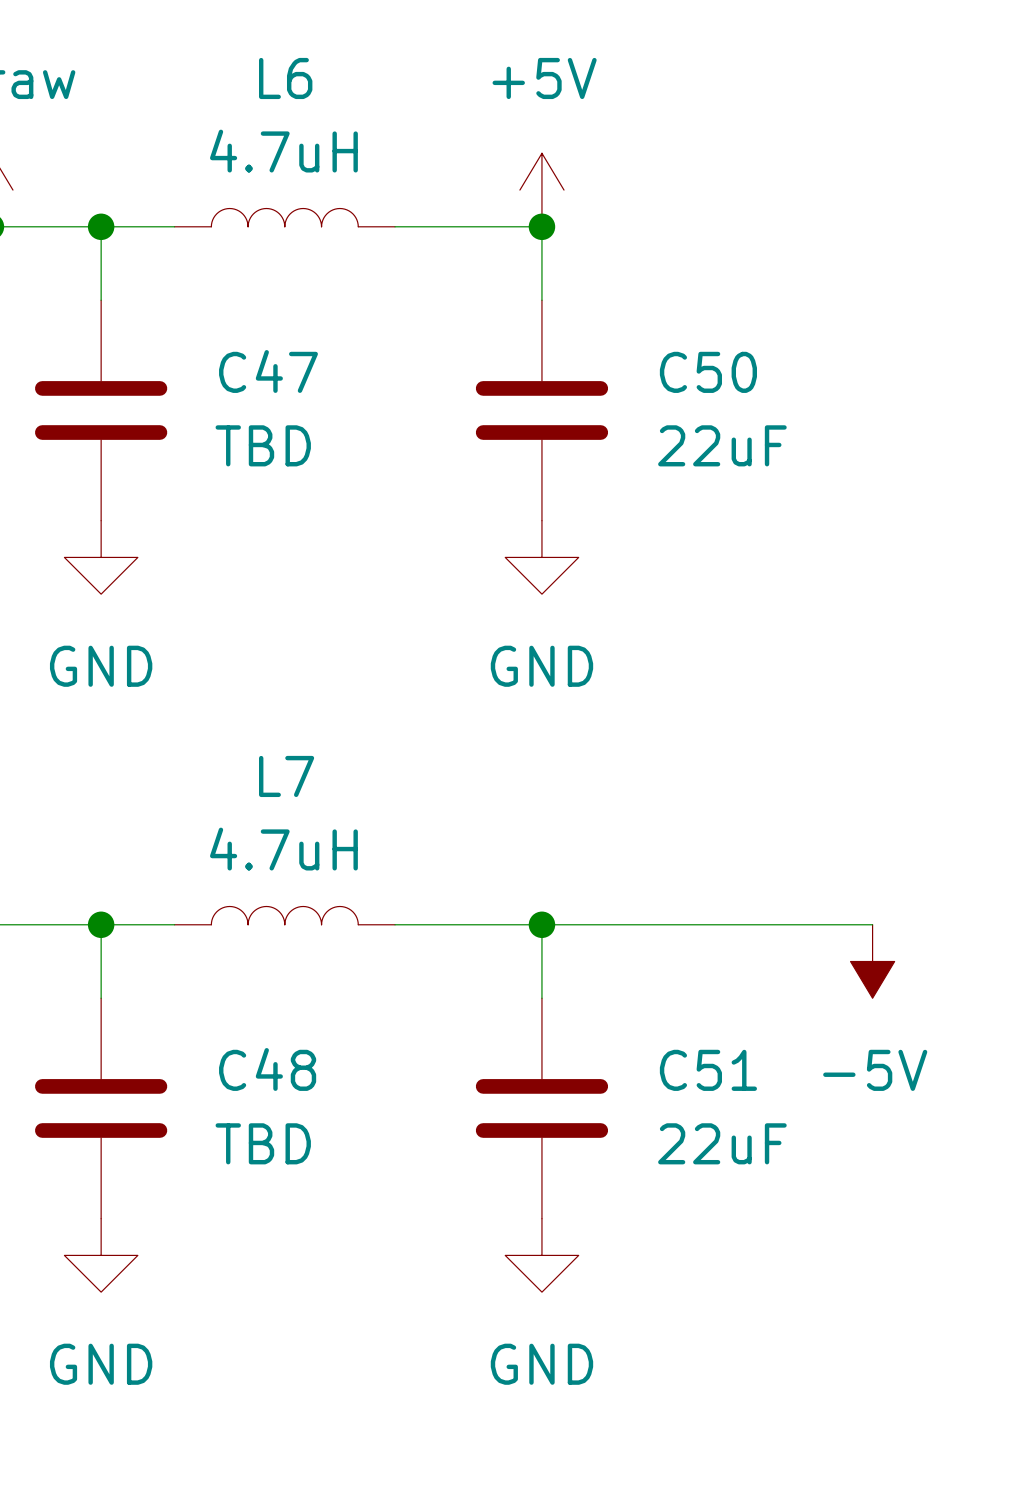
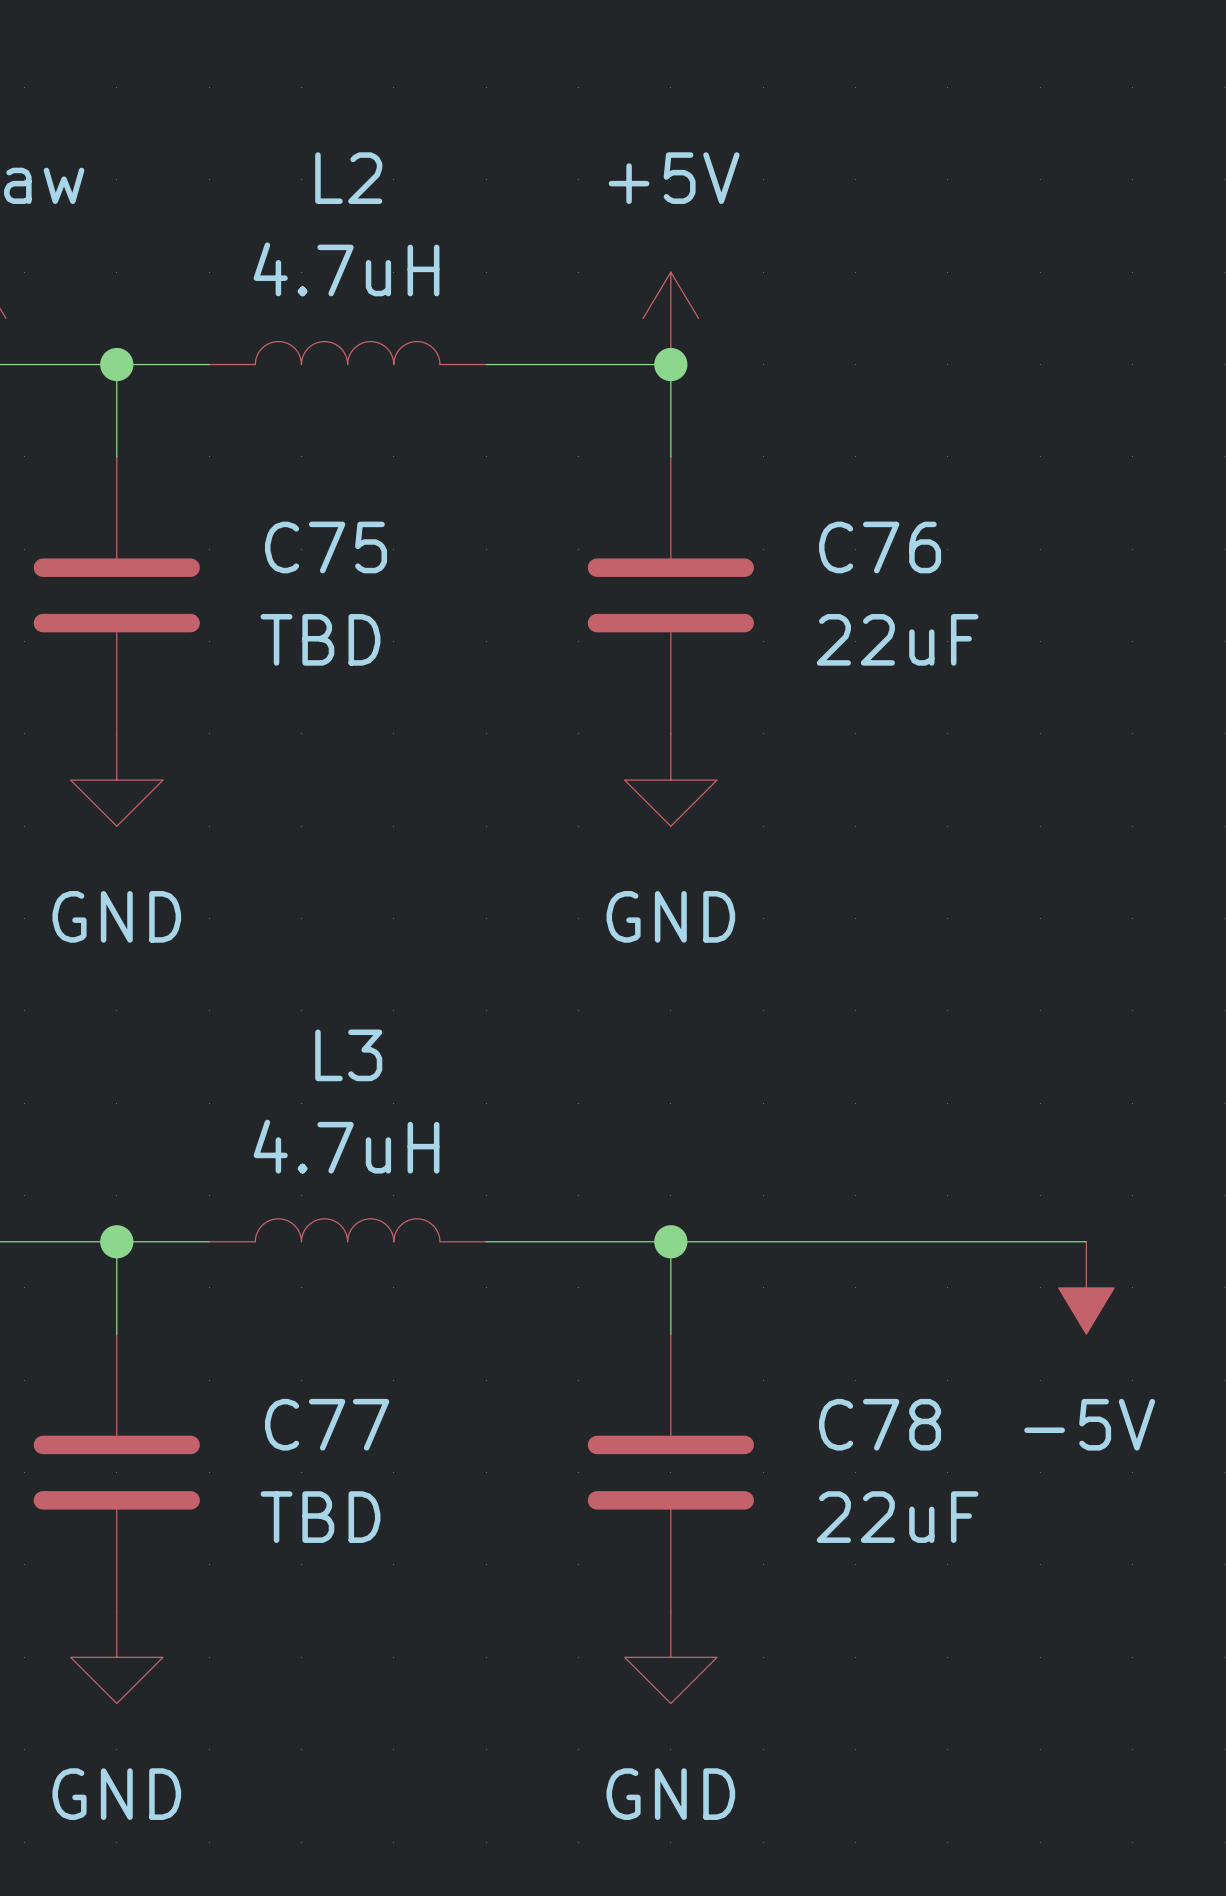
L6 name: L6 (285, 78) -> L2 (348, 178)
C47 name: C47 (268, 371) -> C75 (326, 547)
C50 name: C50 (708, 372) -> C76 (880, 547)
L7 name: L7 (286, 776) -> L3 (348, 1055)
C48 name: C48 (267, 1069) -> C77 (327, 1424)
C51 name: C51 (708, 1070) -> C78 (880, 1424)

